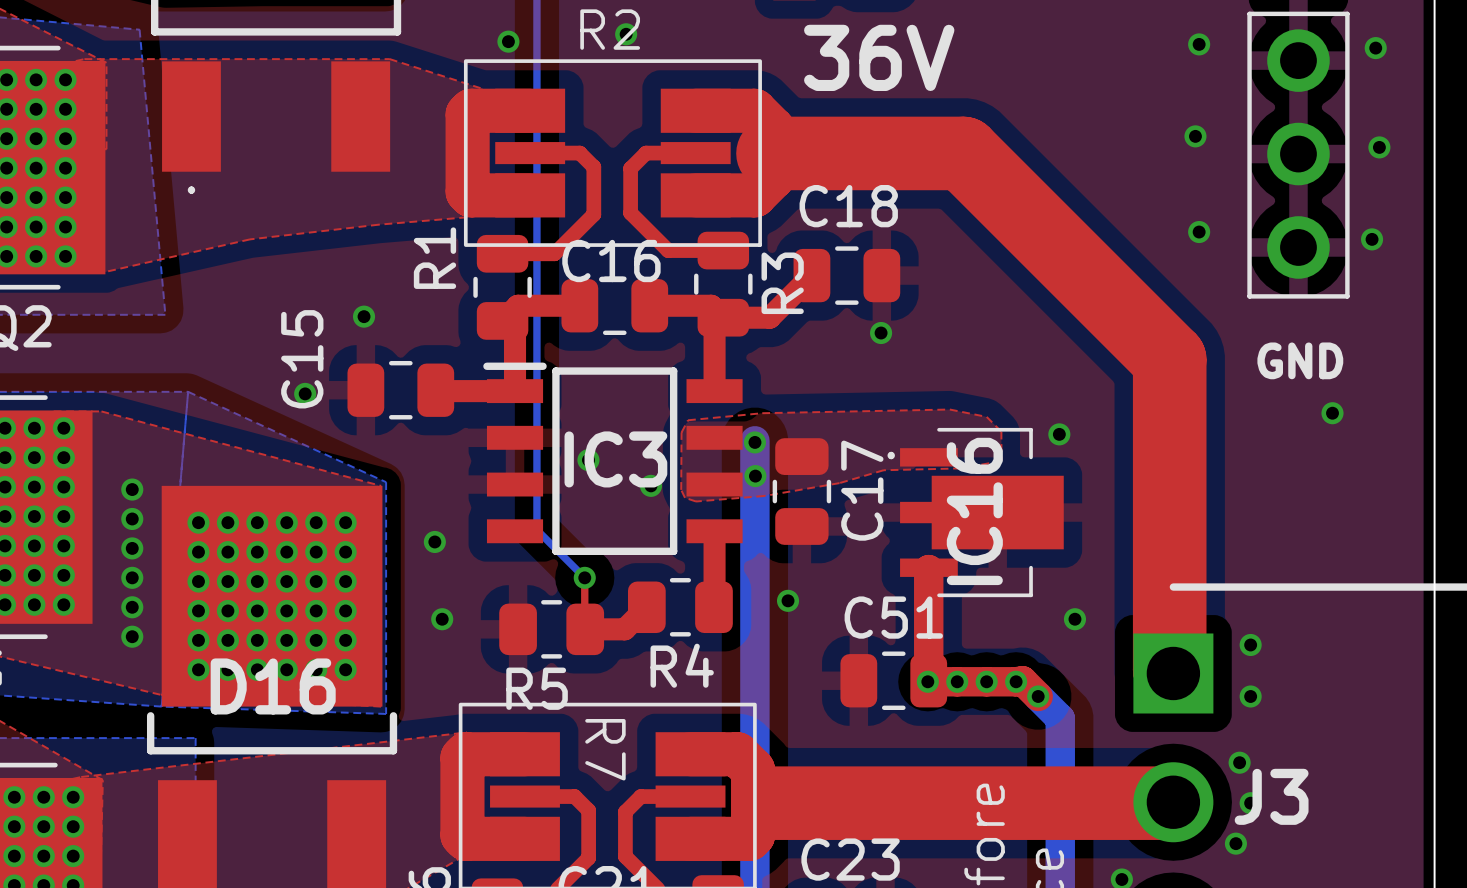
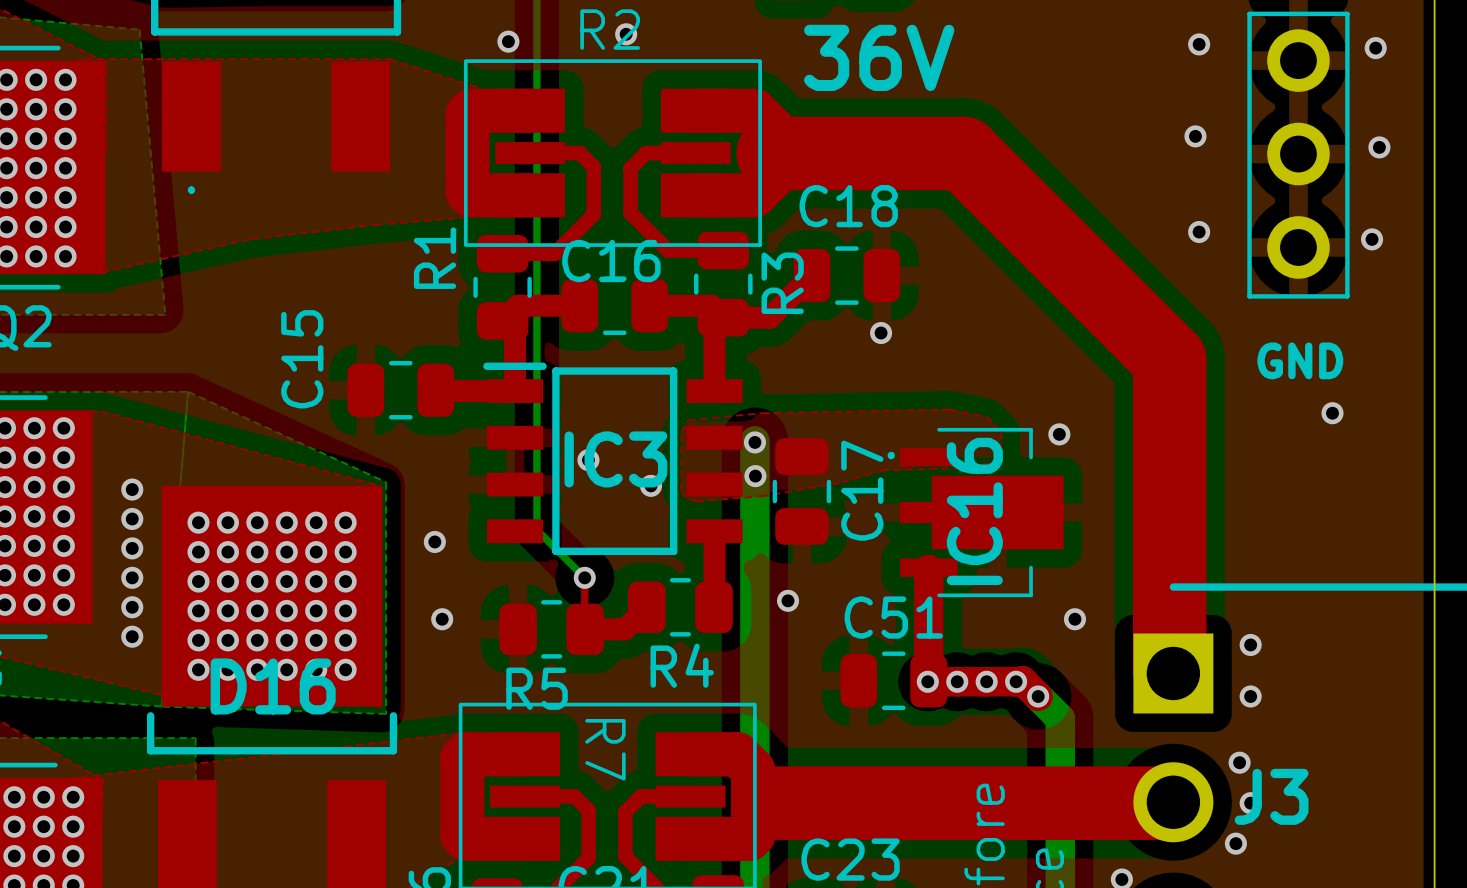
via: (364, 316) -> none
via: (305, 393) -> none

